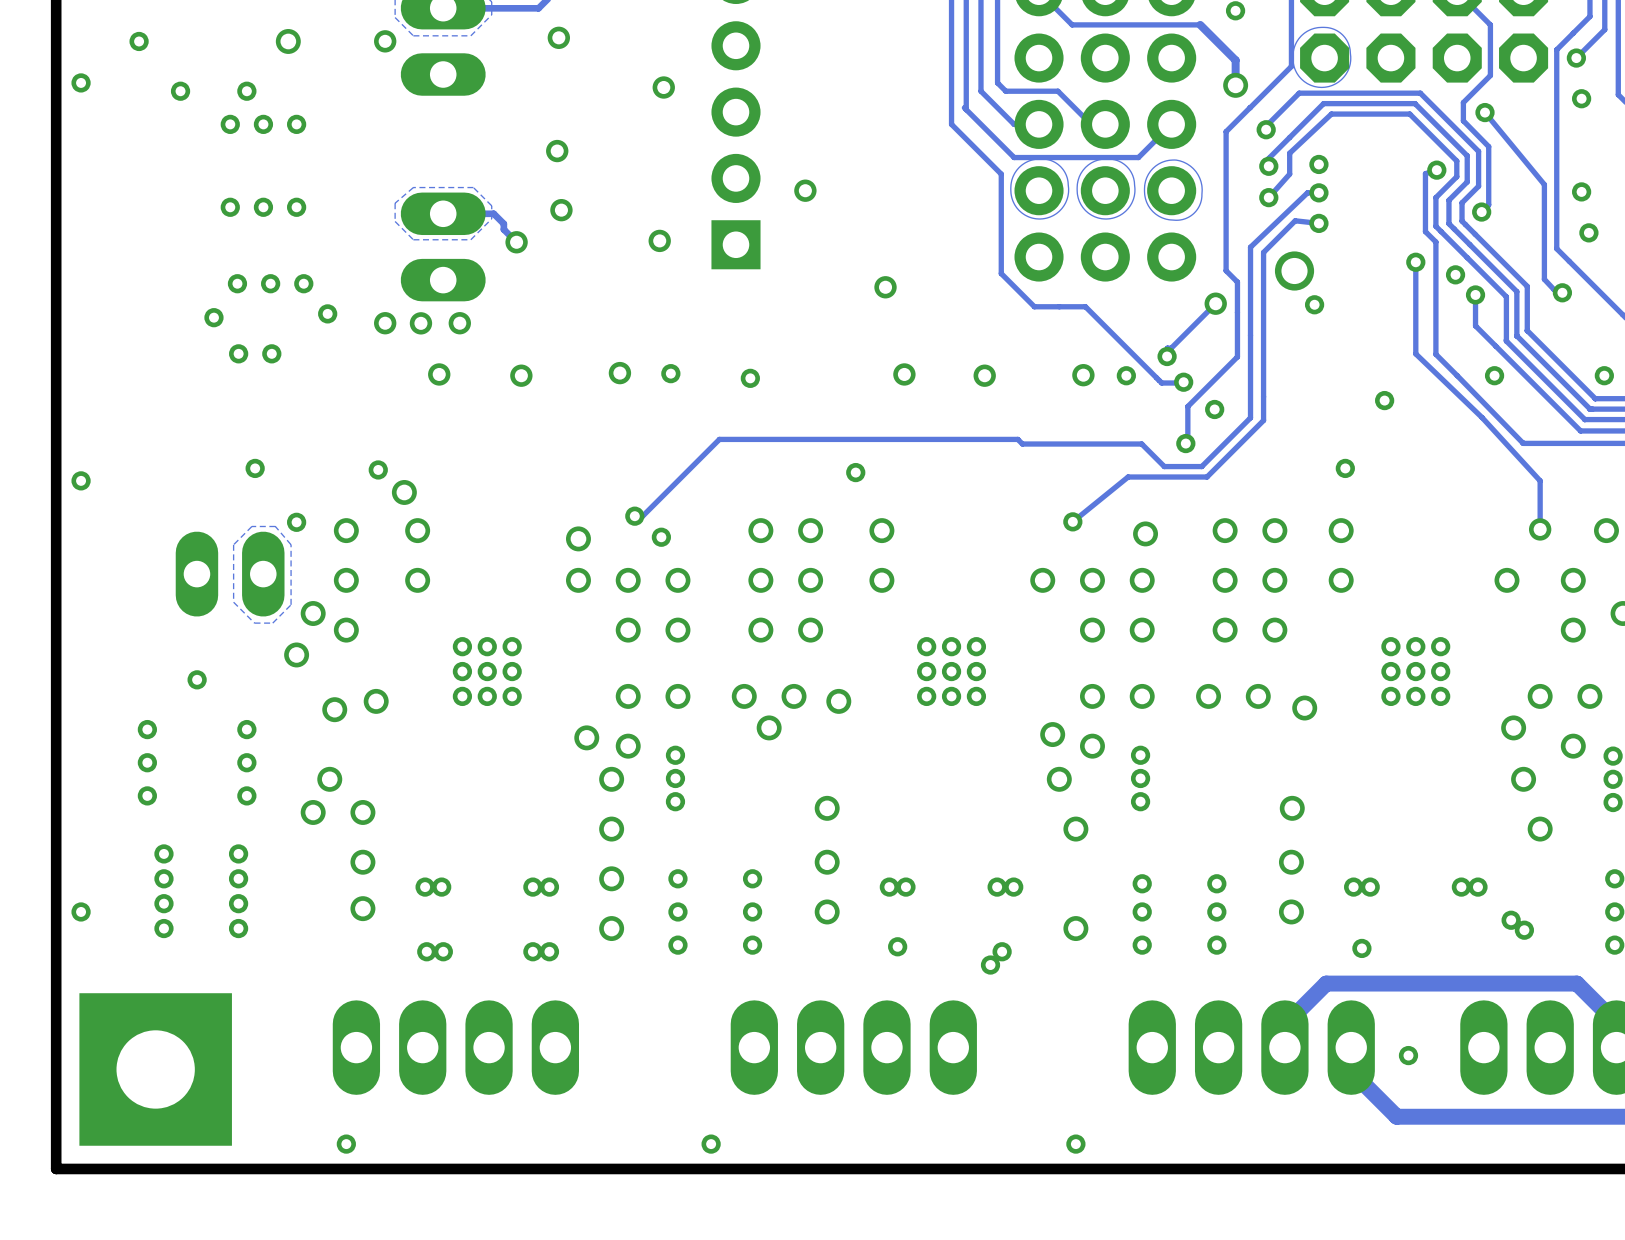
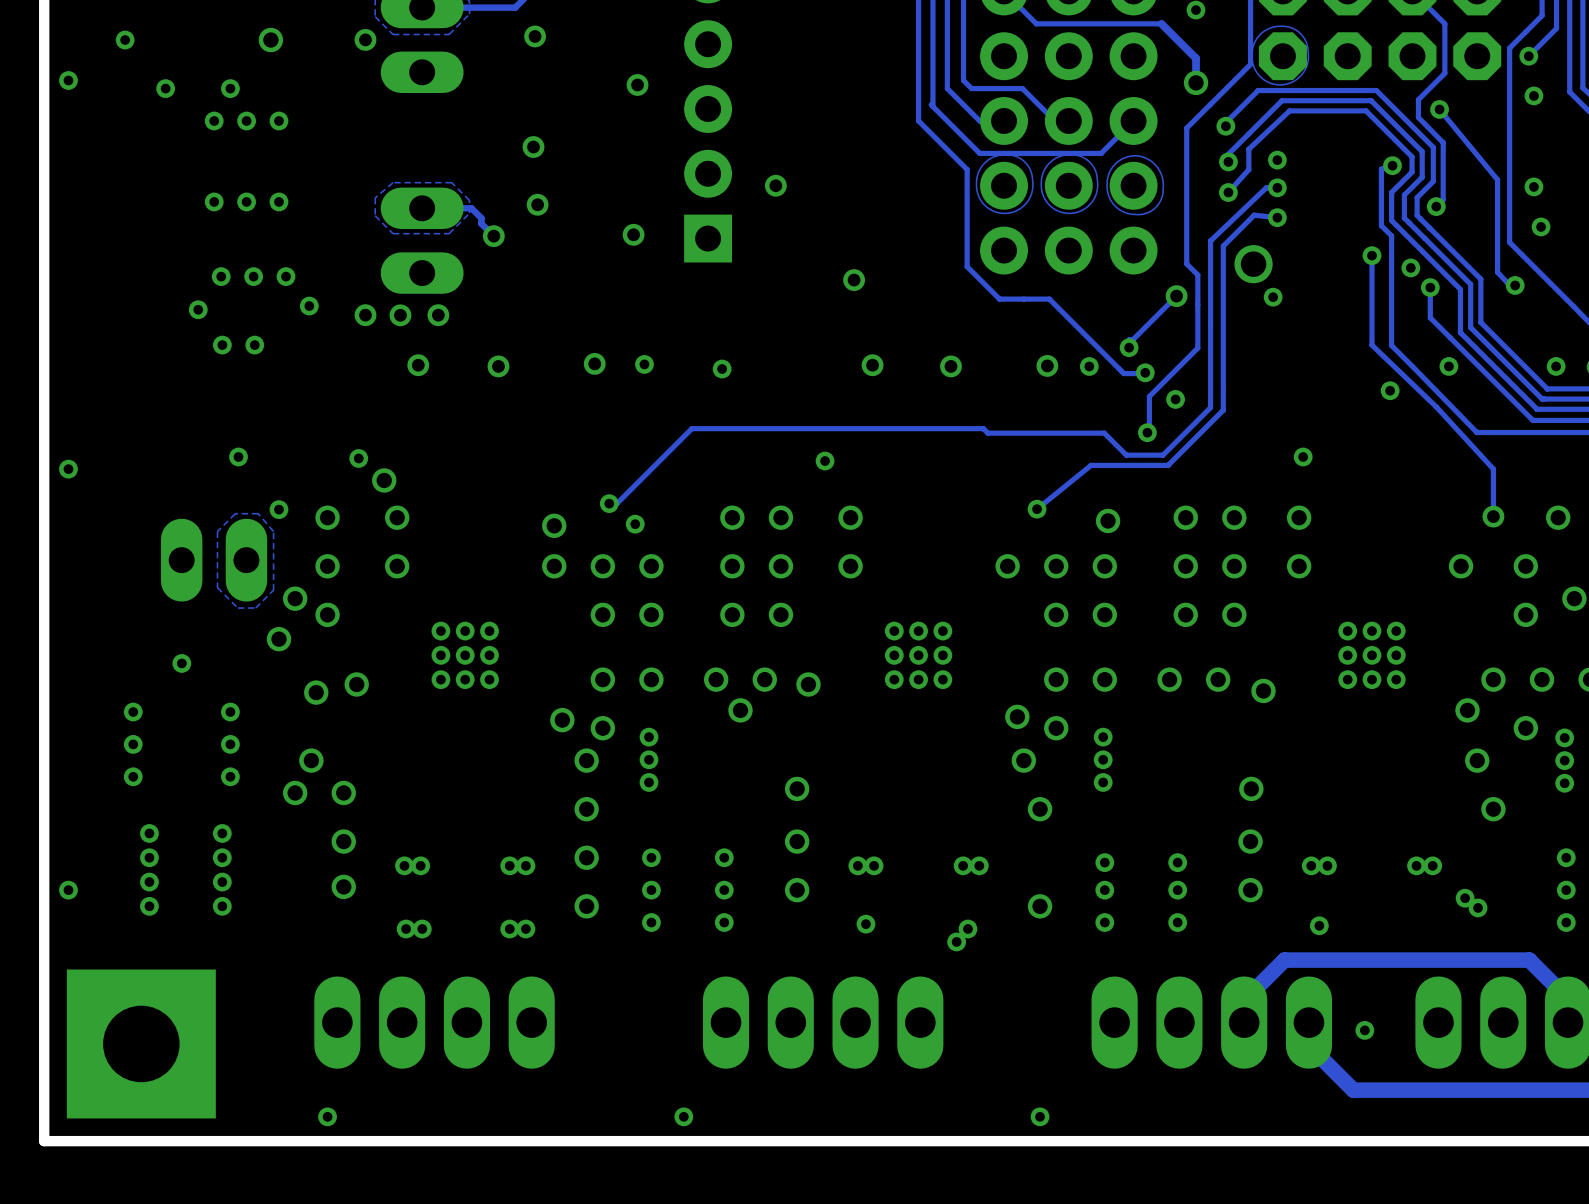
via position: (1384, 400) -> (1390, 390)

